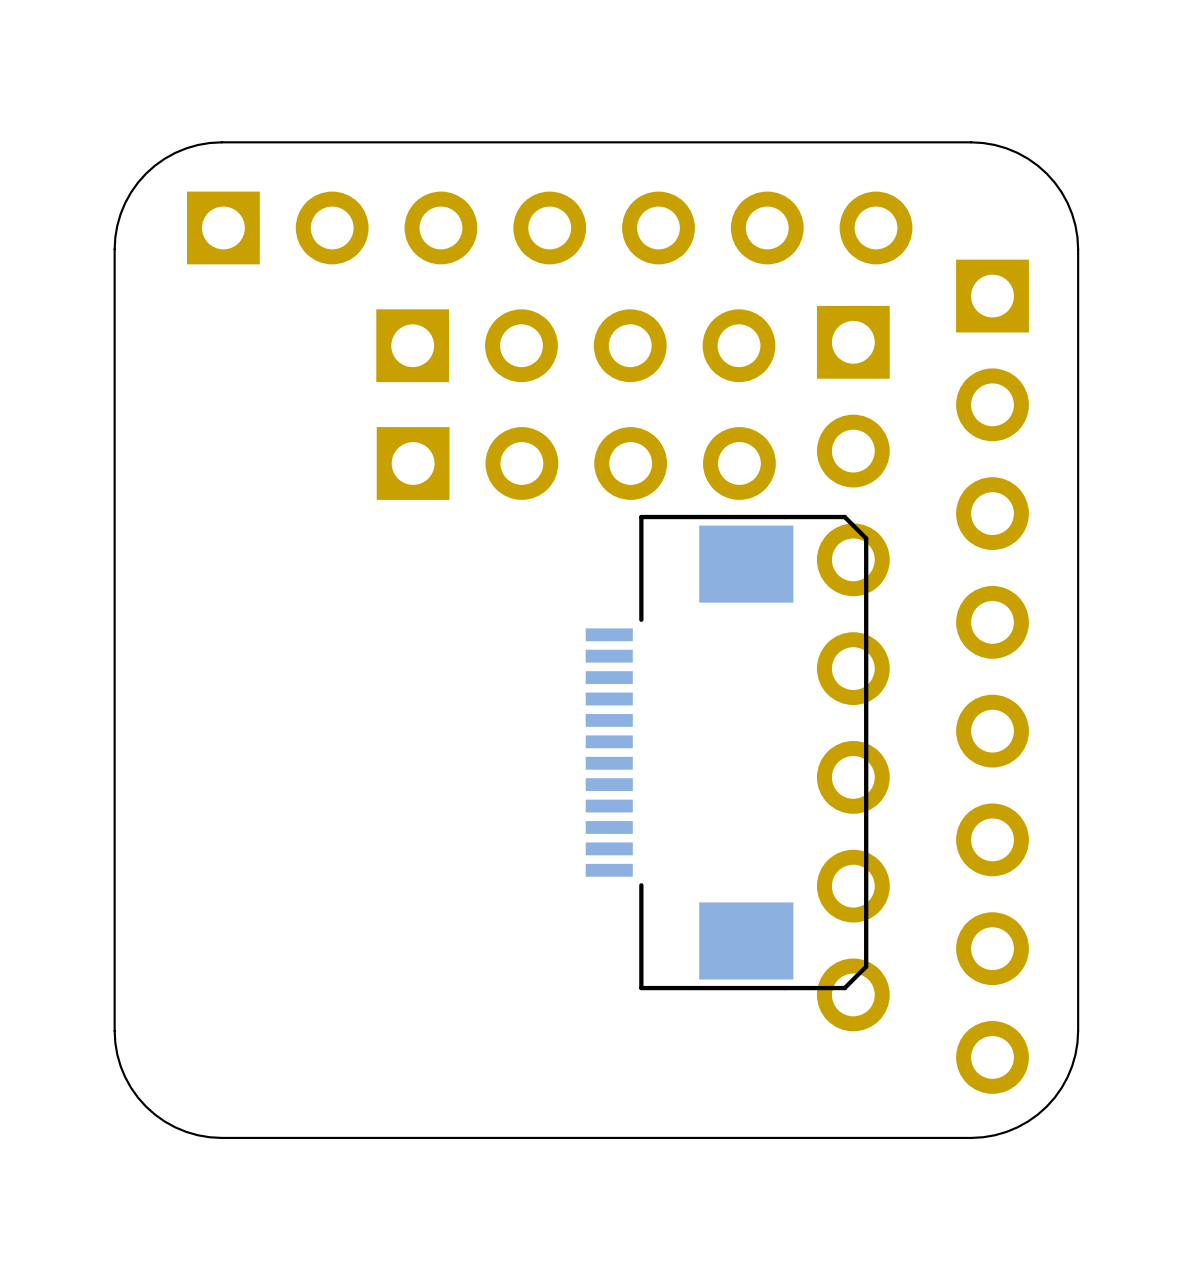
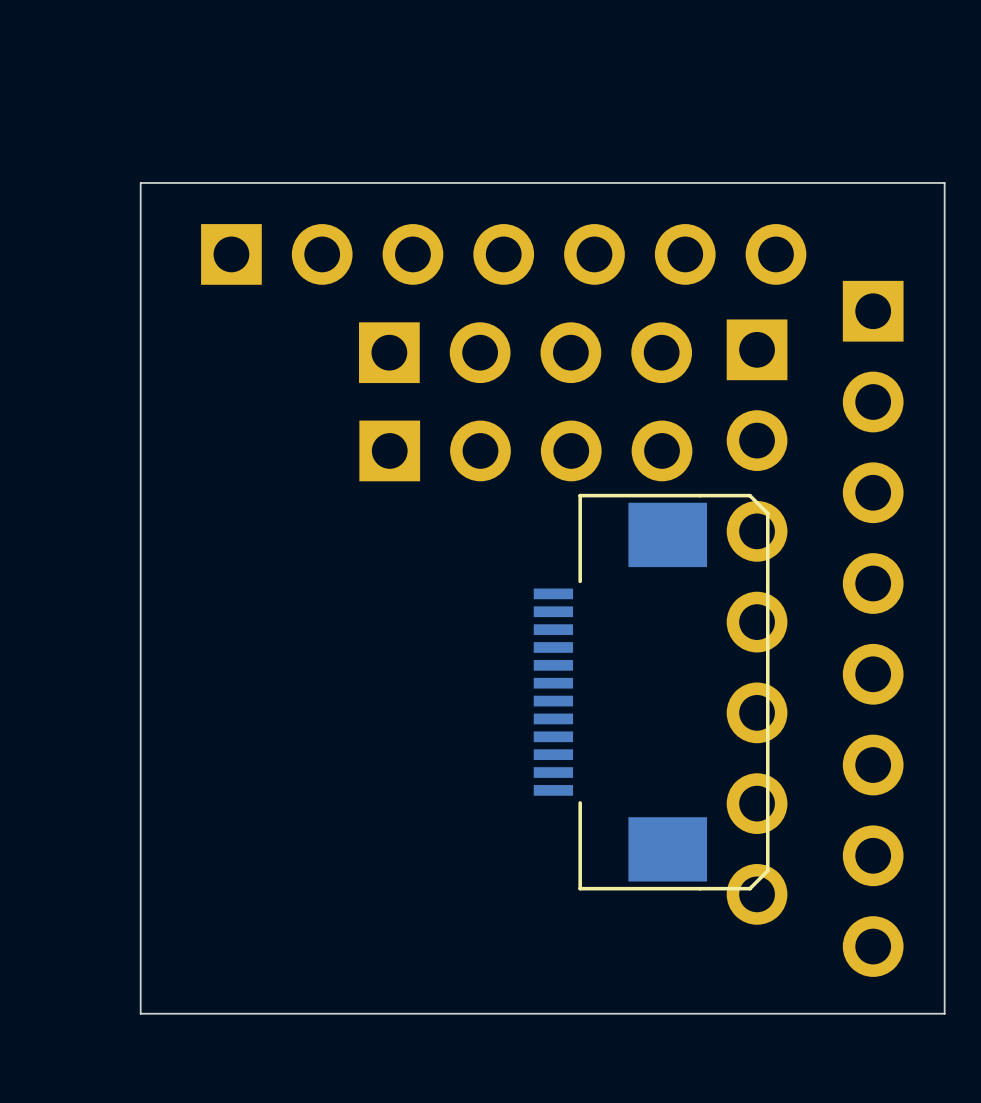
board edge: (221, 142) (186, 148) (164, 158) (146, 173) (125, 202) (117, 225) (114, 249) -> (230, 182) (140, 182) (140, 272)
board edge: (971, 142) (994, 145) (1017, 152) (1046, 173) (1061, 192) (1072, 214) (1078, 249) -> (855, 182) (944, 182) (944, 272)
board edge: (114, 1030) (117, 1054) (125, 1077) (146, 1106) (175, 1127) (197, 1135) (221, 1137) -> (140, 924) (140, 1013) (230, 1013)
board edge: (1078, 1030) (1072, 1066) (1061, 1087) (1046, 1106) (1017, 1127) (994, 1135) (971, 1137) -> (944, 924) (944, 1013) (855, 1013)

